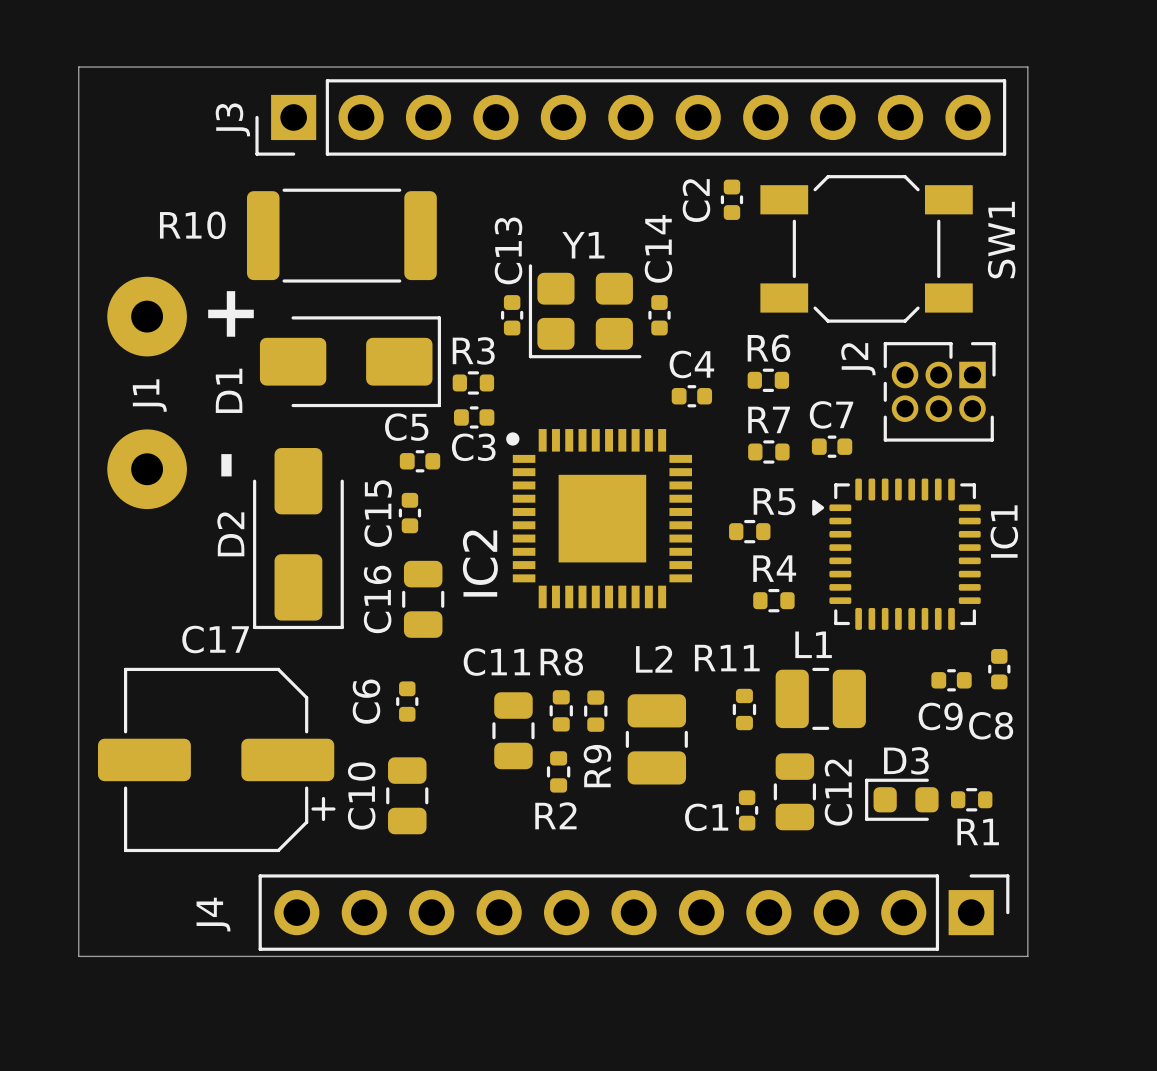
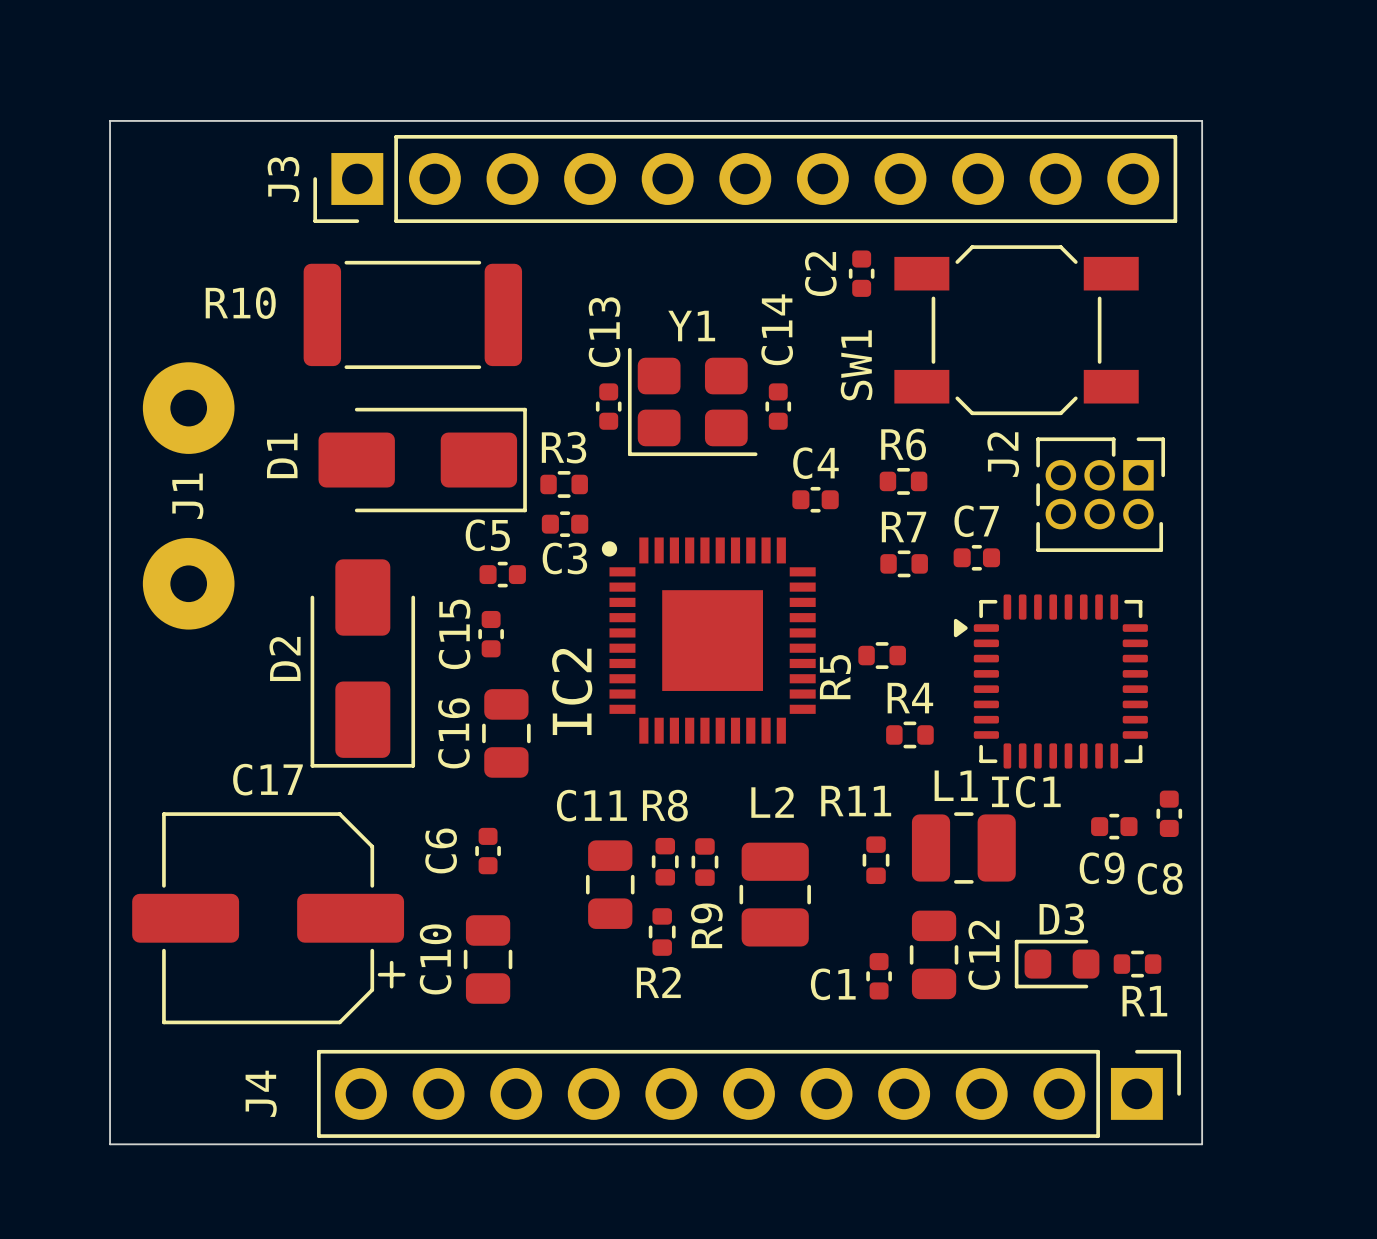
SW1 name position: SW1 (1001, 240) -> SW1 (856, 365)
text: + (230, 313) -> none
D1 name position: D1 (229, 390) -> D1 (282, 455)
text: - (226, 465) -> none
R5 name rotation: 0° (774, 501) -> 90° counterclockwise (835, 677)
R5 name position: R5 (774, 501) -> R5 (835, 677)
IC1 name rotation: 0° (1004, 531) -> 90° clockwise (1026, 791)
IC1 name position: IC1 (1004, 531) -> IC1 (1026, 791)

